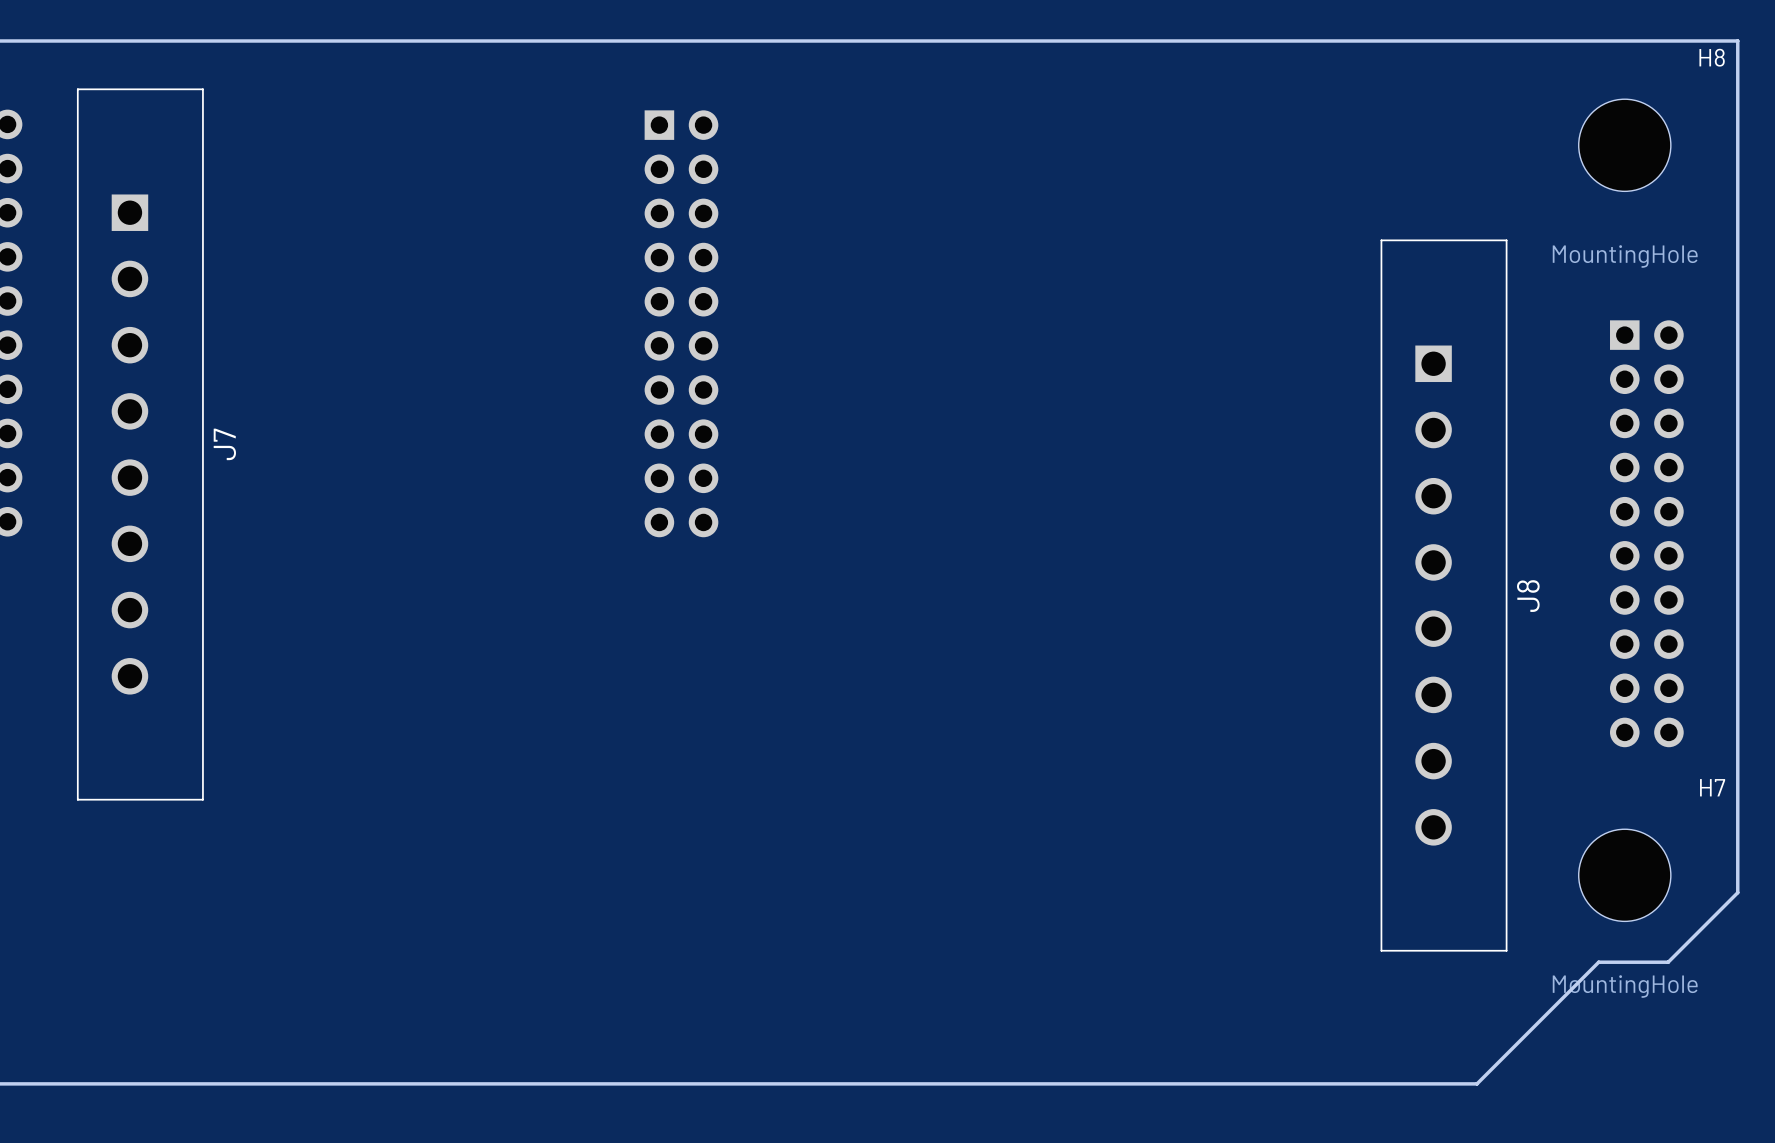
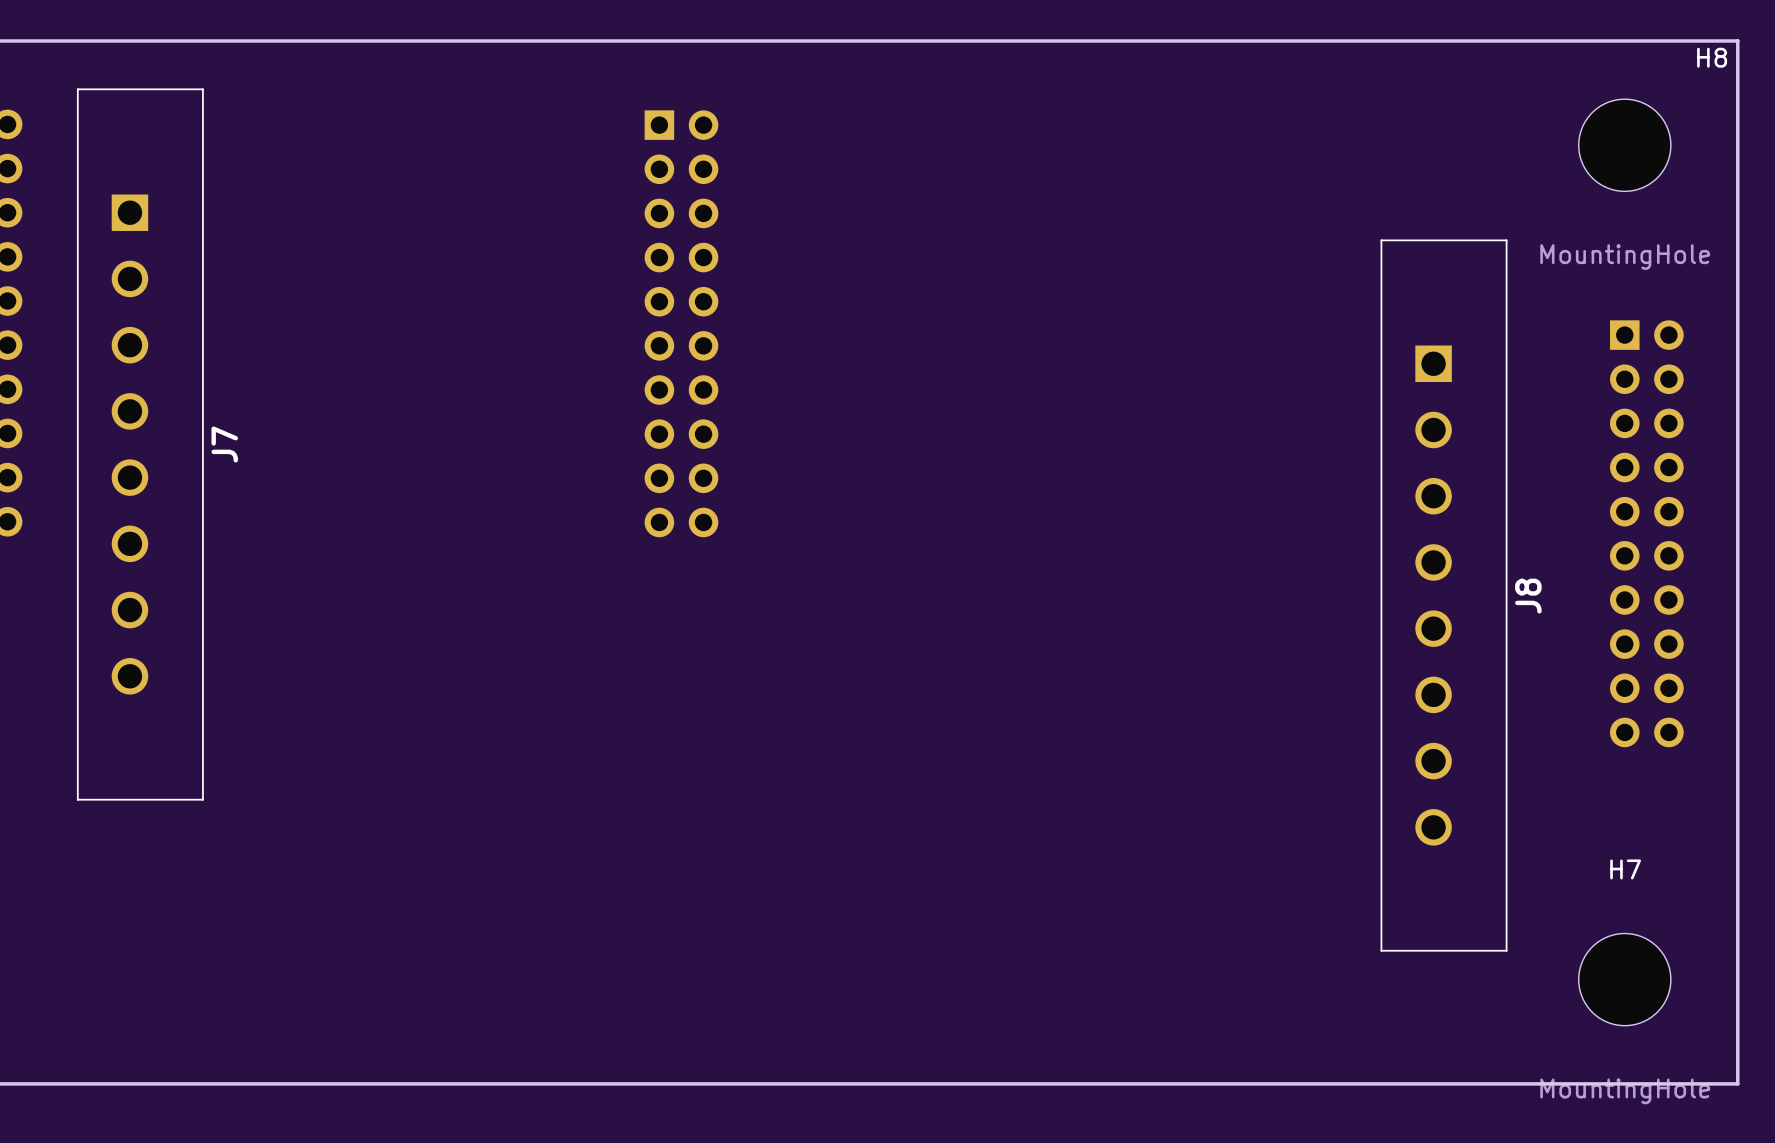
H7 name position: H7 (1712, 787) -> H7 (1625, 869)
H7 position: (1624, 875) -> (1624, 979)
board edge: (1737, 892) (1668, 962) (1598, 962) (1477, 1083) -> (1737, 892) (1737, 1083) (1477, 1083)

